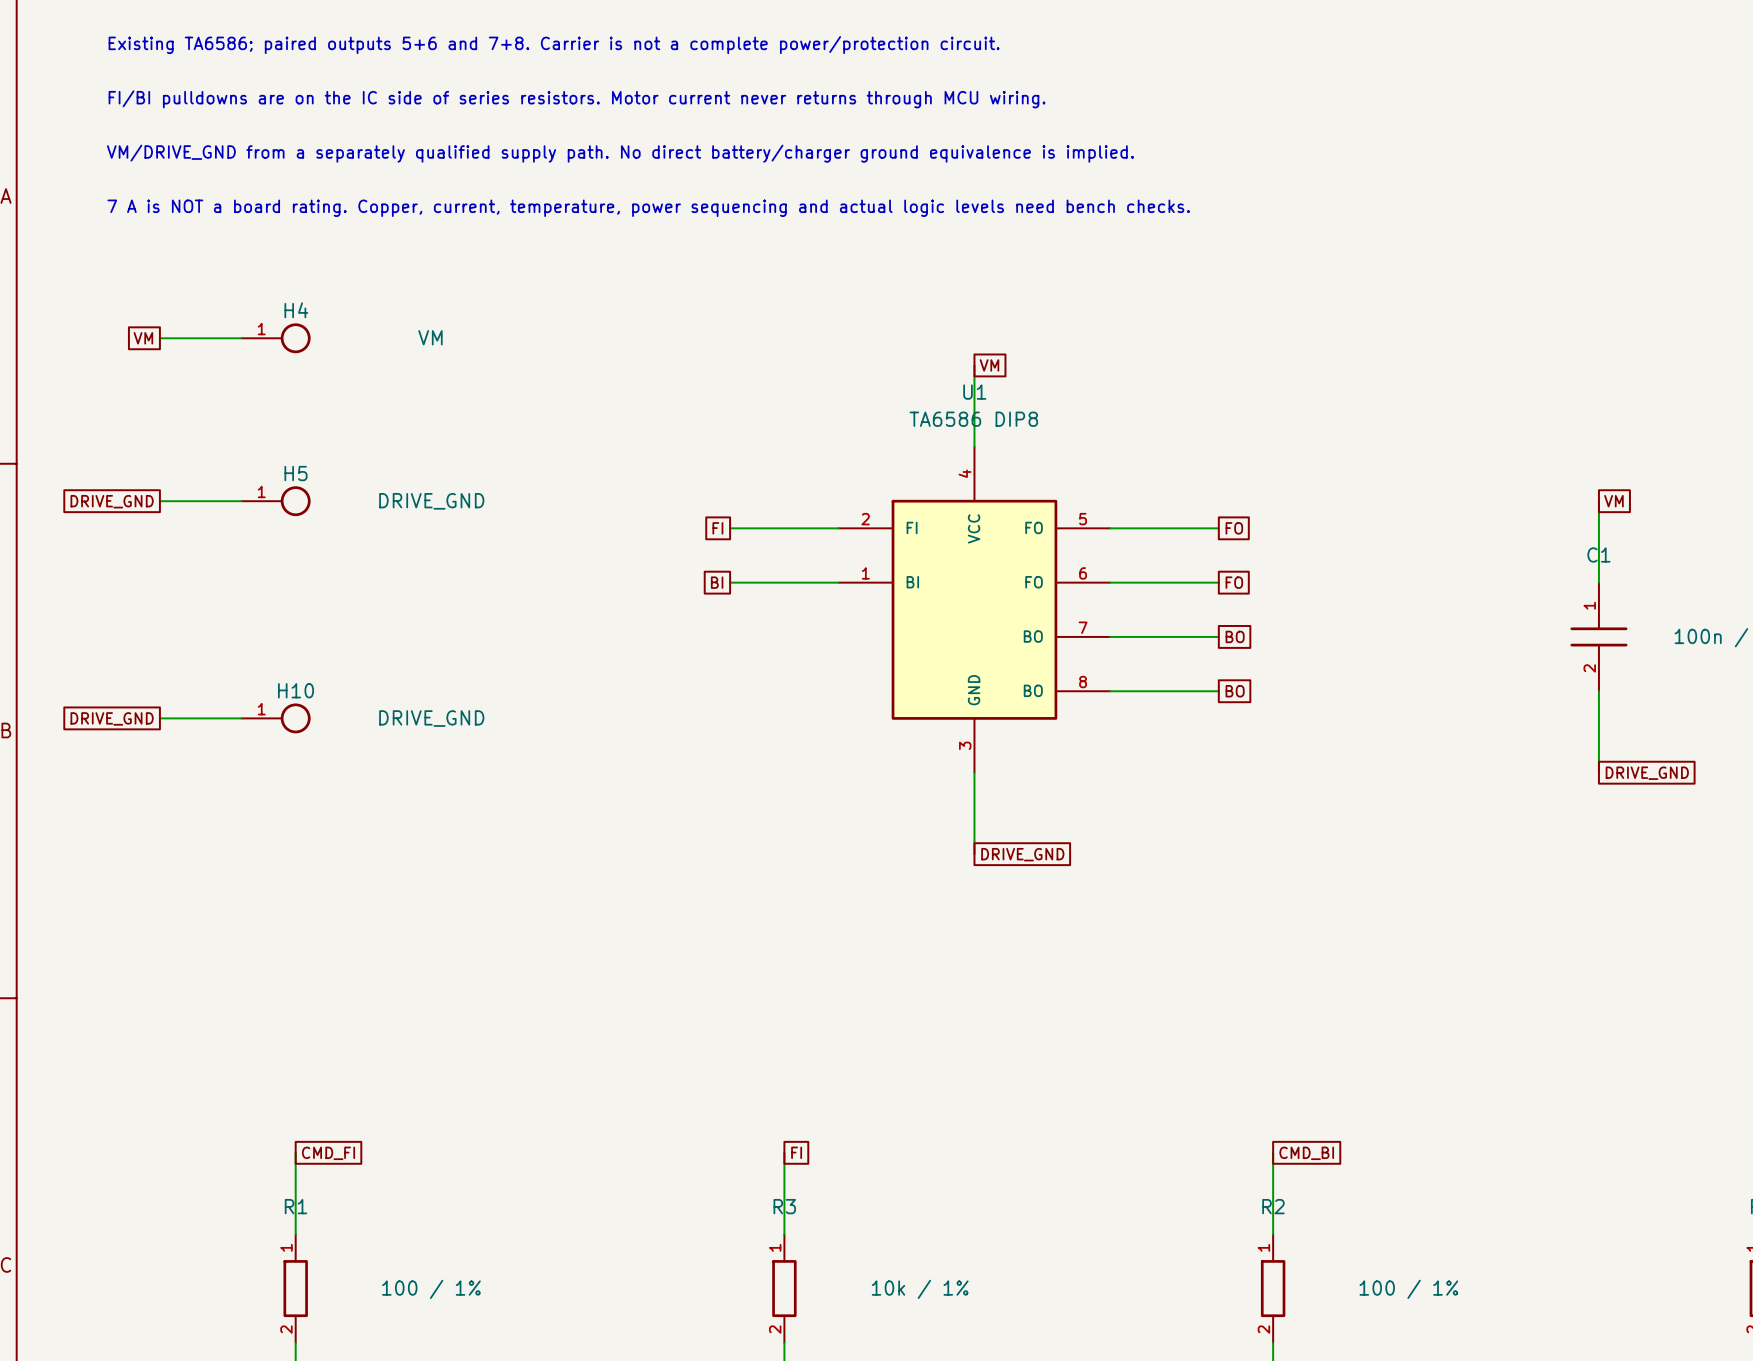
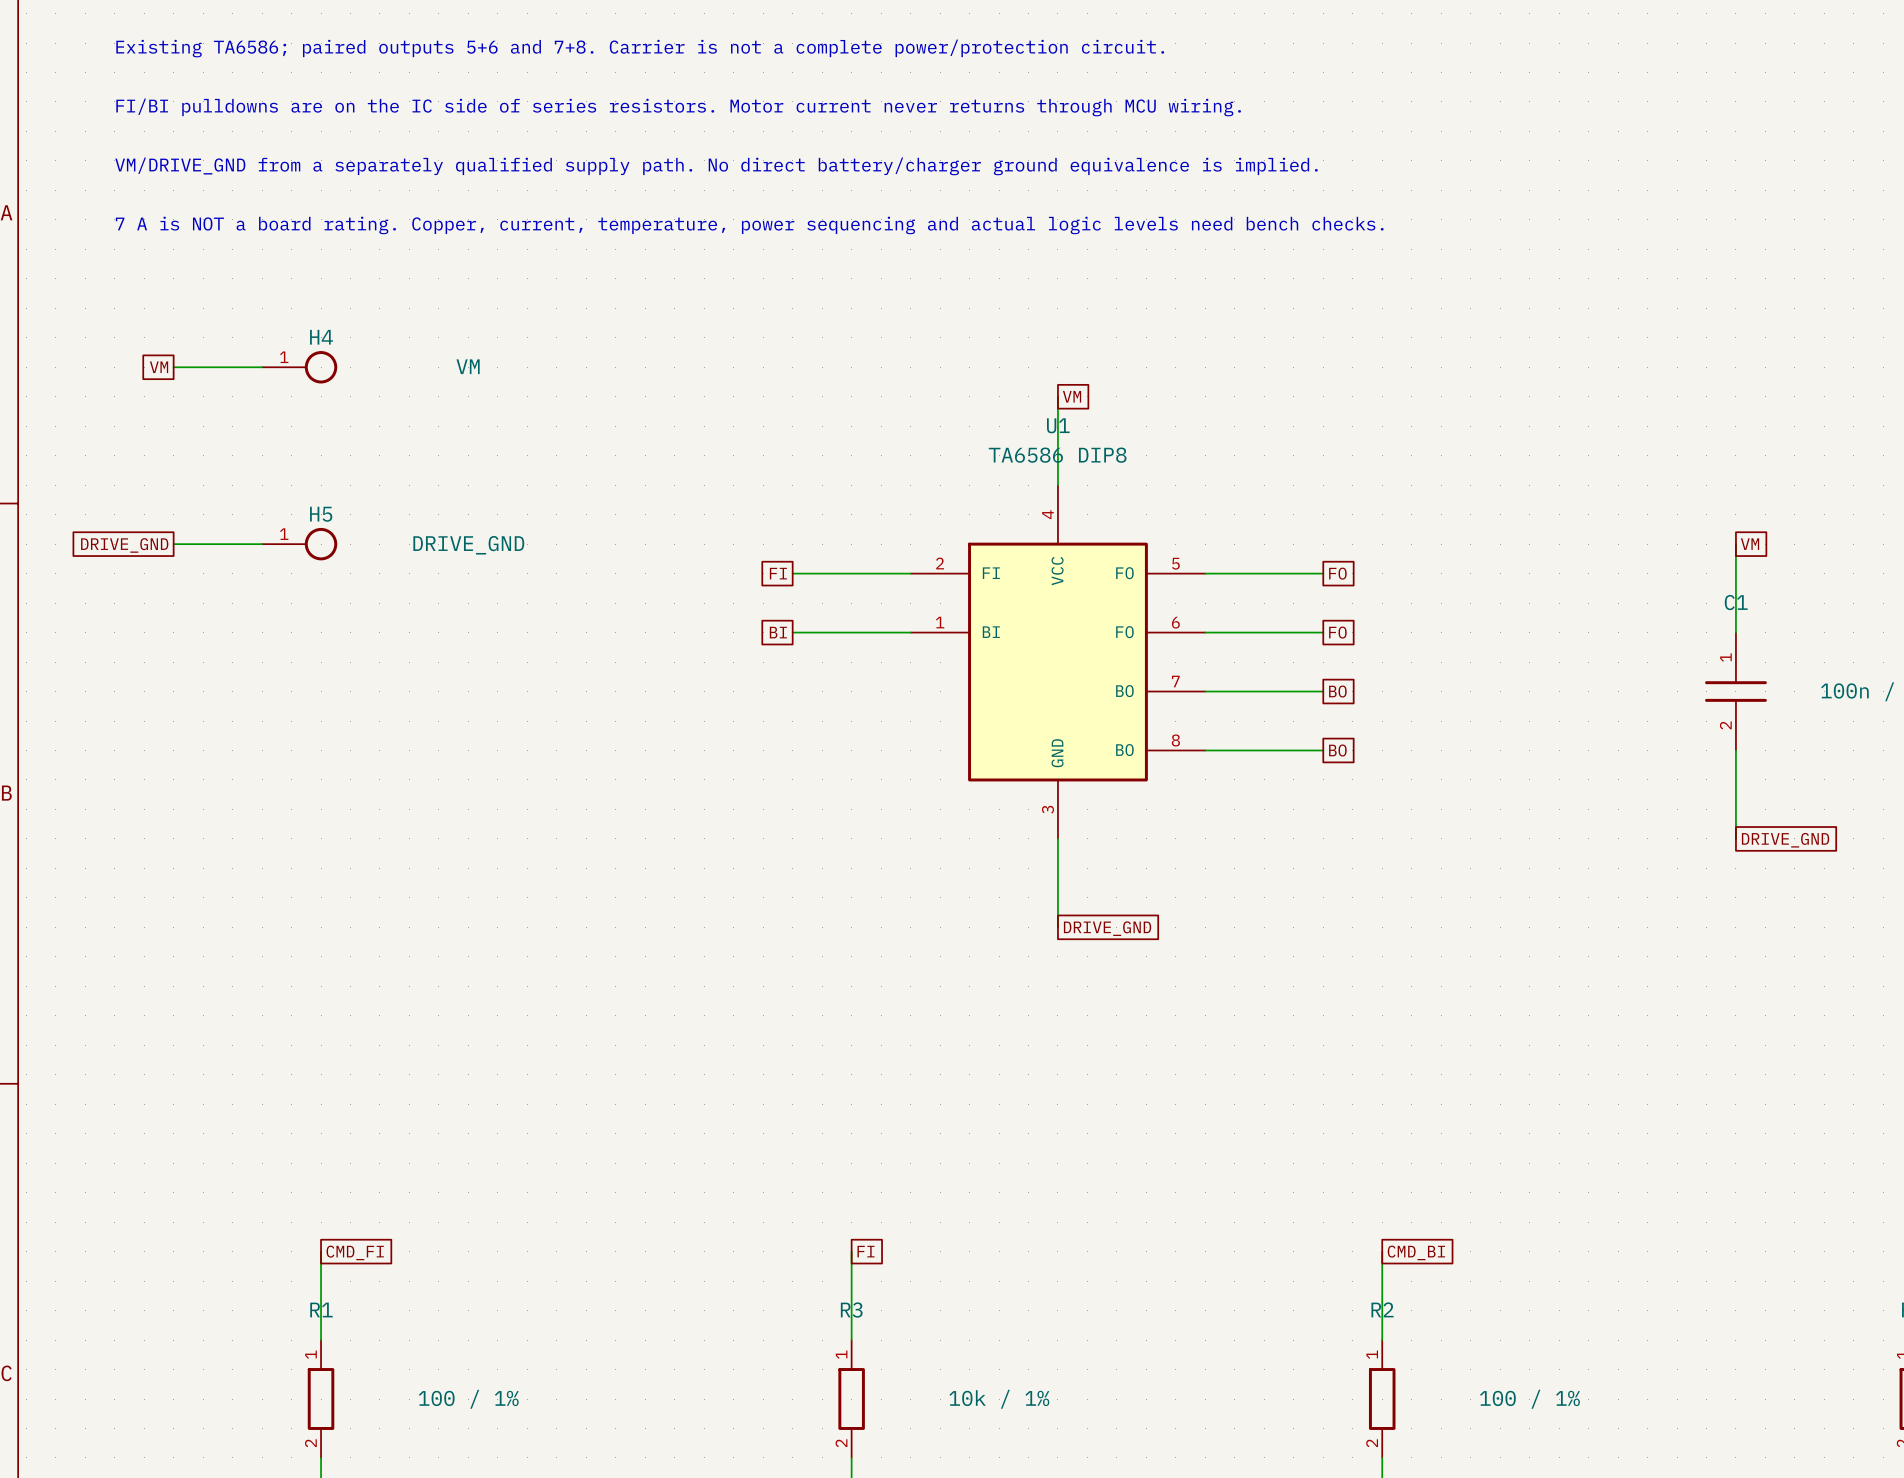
global label: DRIVE_GND (112, 718) -> none
wire: (159, 718) (241, 718) -> none
H10: DRIVE_GND (276, 718) -> none

